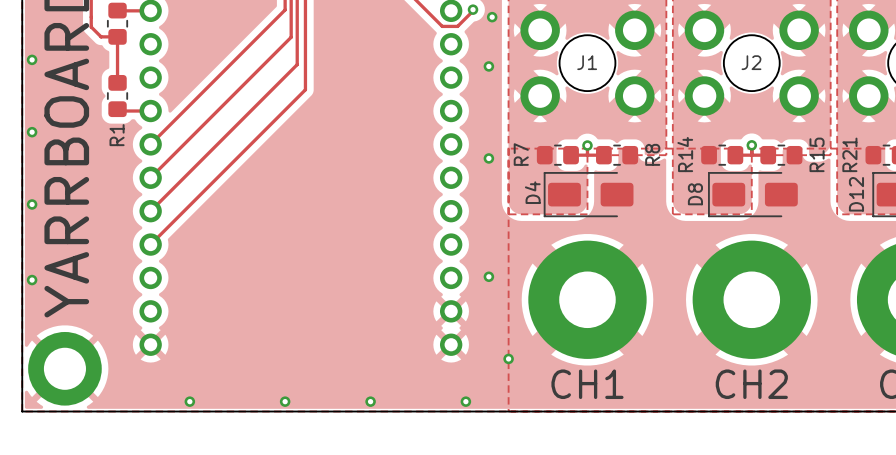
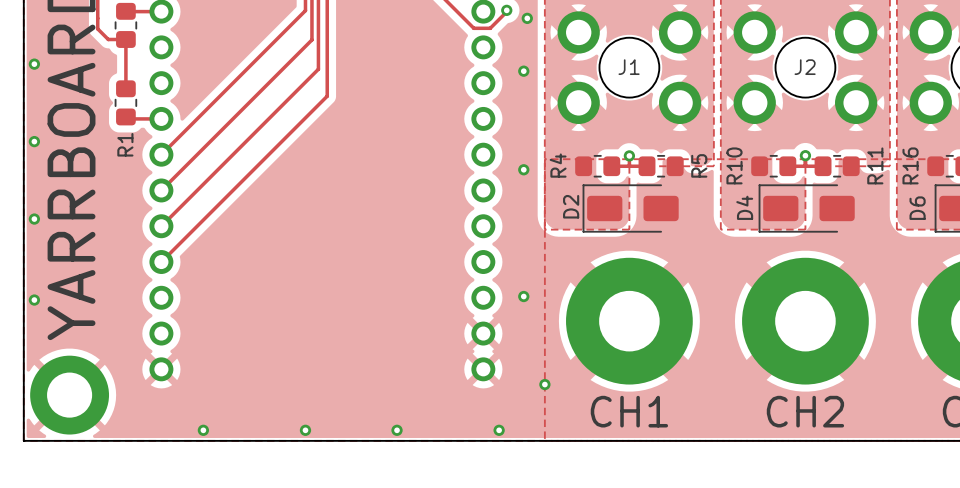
R7 name: R7 (521, 154) -> R4 (558, 165)
R8 name: R8 (652, 154) -> R5 (699, 165)
R14 name: R14 (685, 154) -> R10 (734, 165)
R15 name: R15 (817, 154) -> R11 (875, 165)
R21 name: R21 (849, 154) -> R16 (910, 165)
D4 name: D4 (532, 192) -> D2 (571, 206)
D8 name: D8 (695, 194) -> D4 (744, 207)
D12 name: D12 (856, 194) -> D6 (917, 208)

